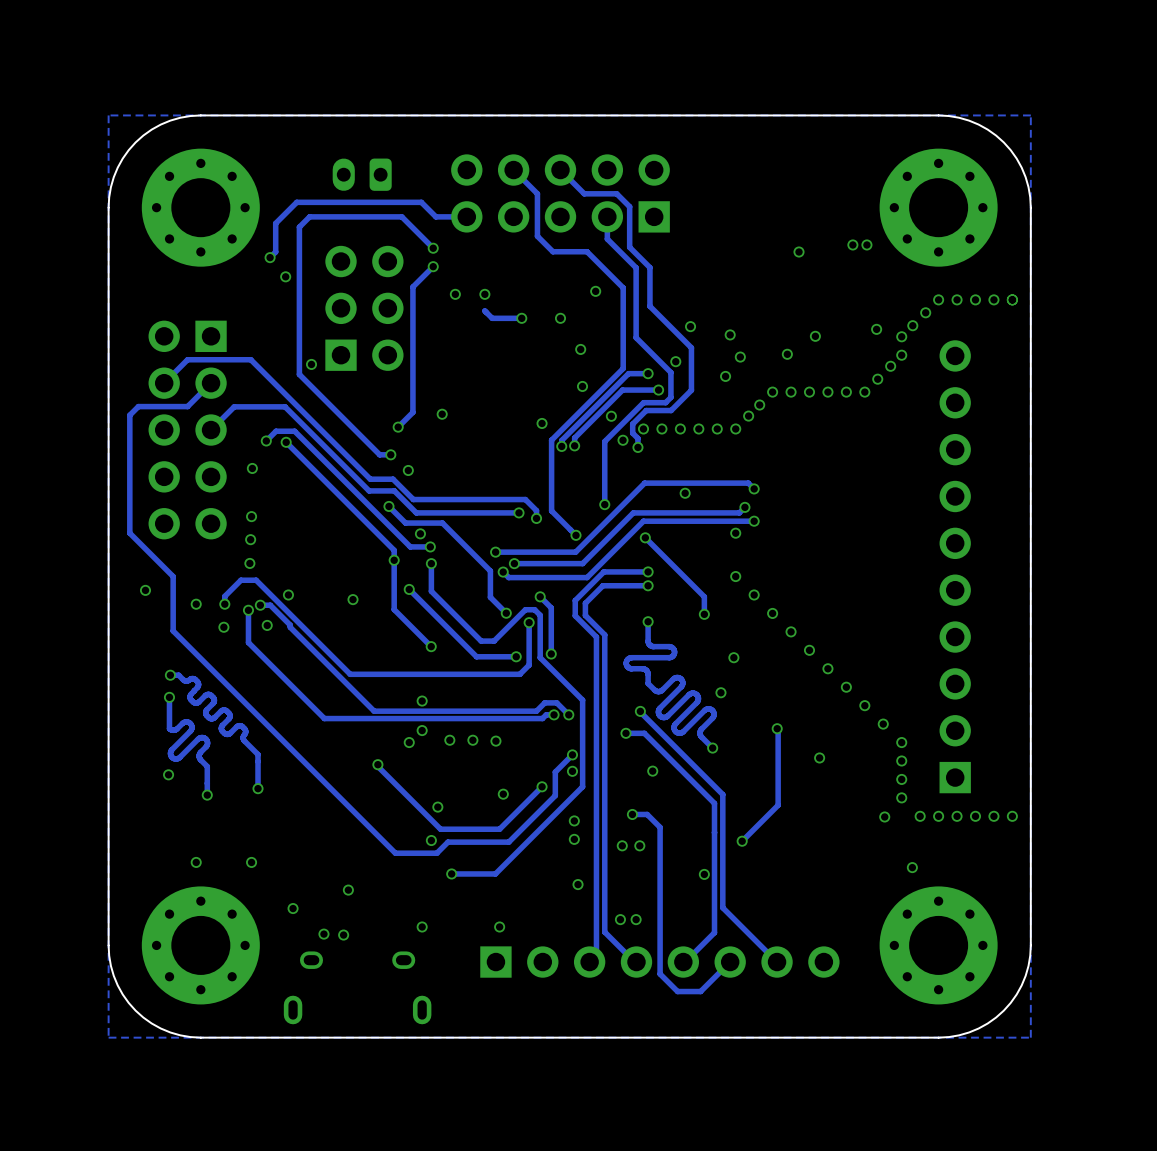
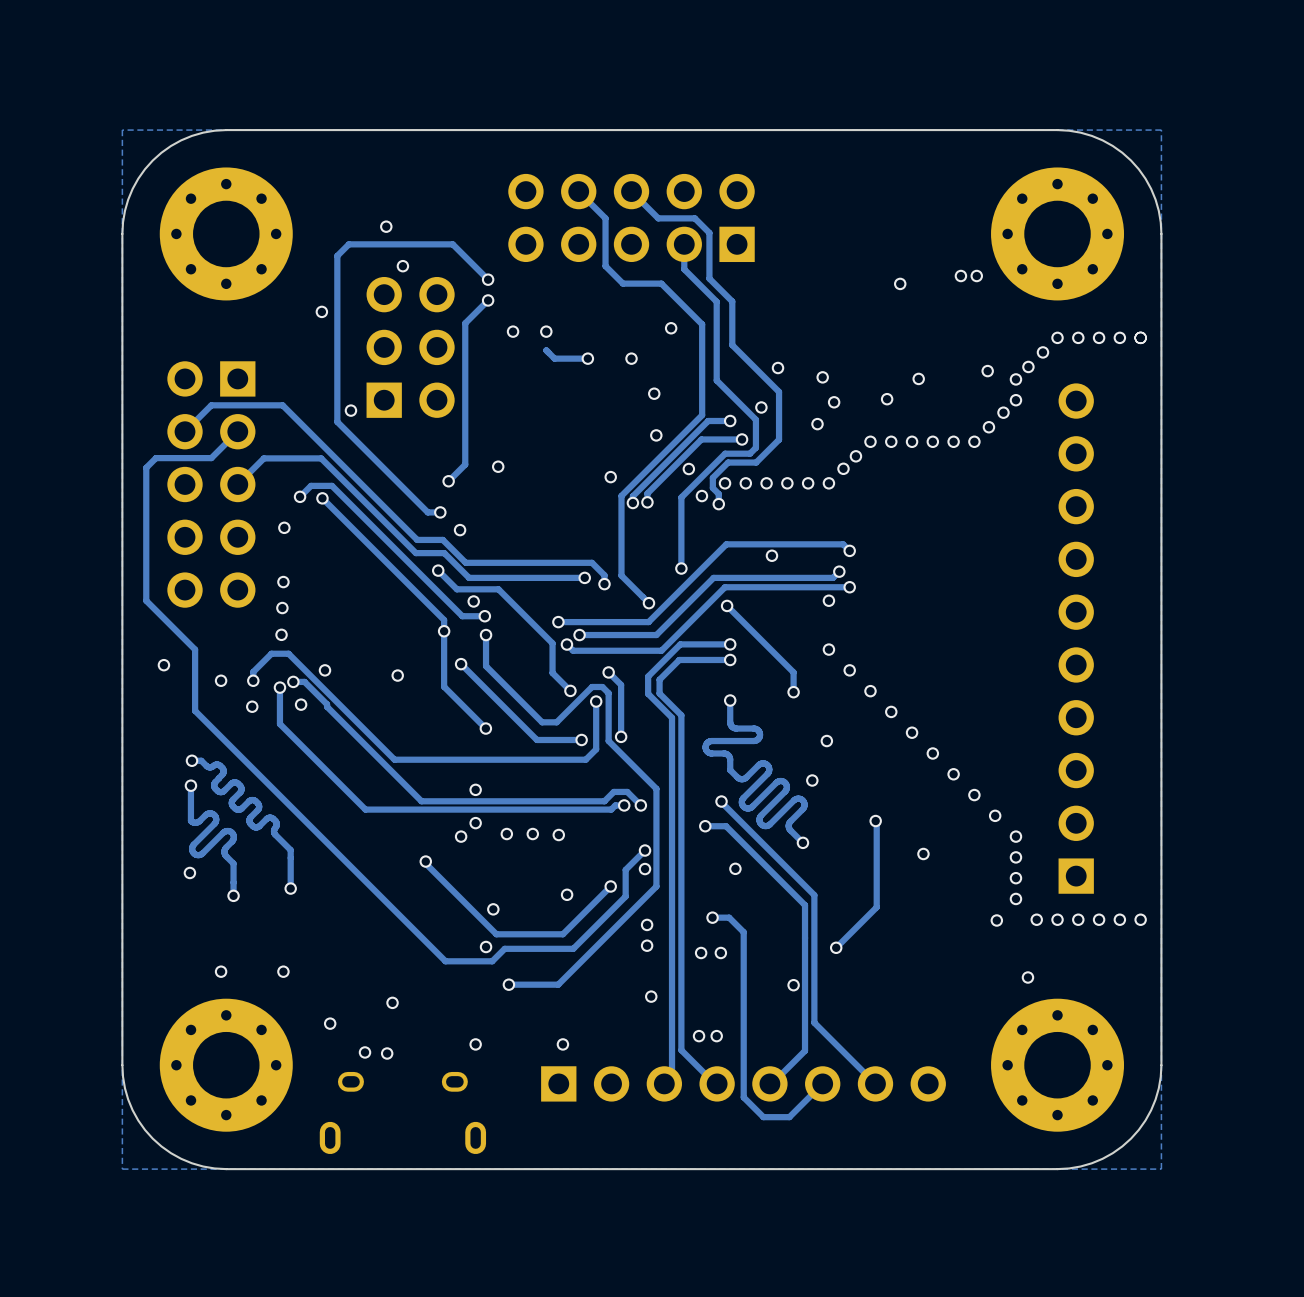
part: (362, 174) -> none
via: none -> (386, 226)
track: (466, 216) (435, 216) (421, 202) (296, 202) (275, 223) (275, 252) (270, 257) -> none
via: none -> (402, 266)
via: (270, 257) -> none

